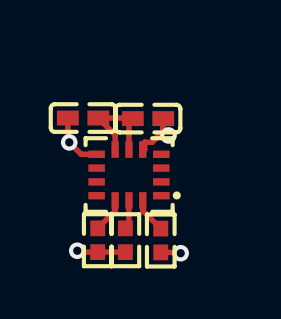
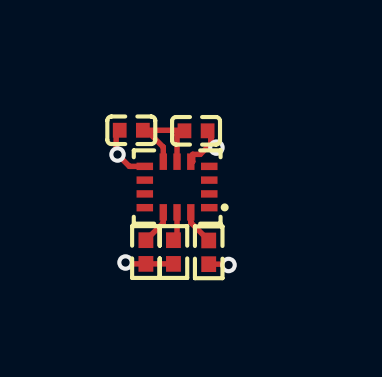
part footprint: [48, 102, 118, 134] -> [105, 114, 158, 147]
part footprint: [113, 102, 183, 135] -> [170, 114, 223, 147]

